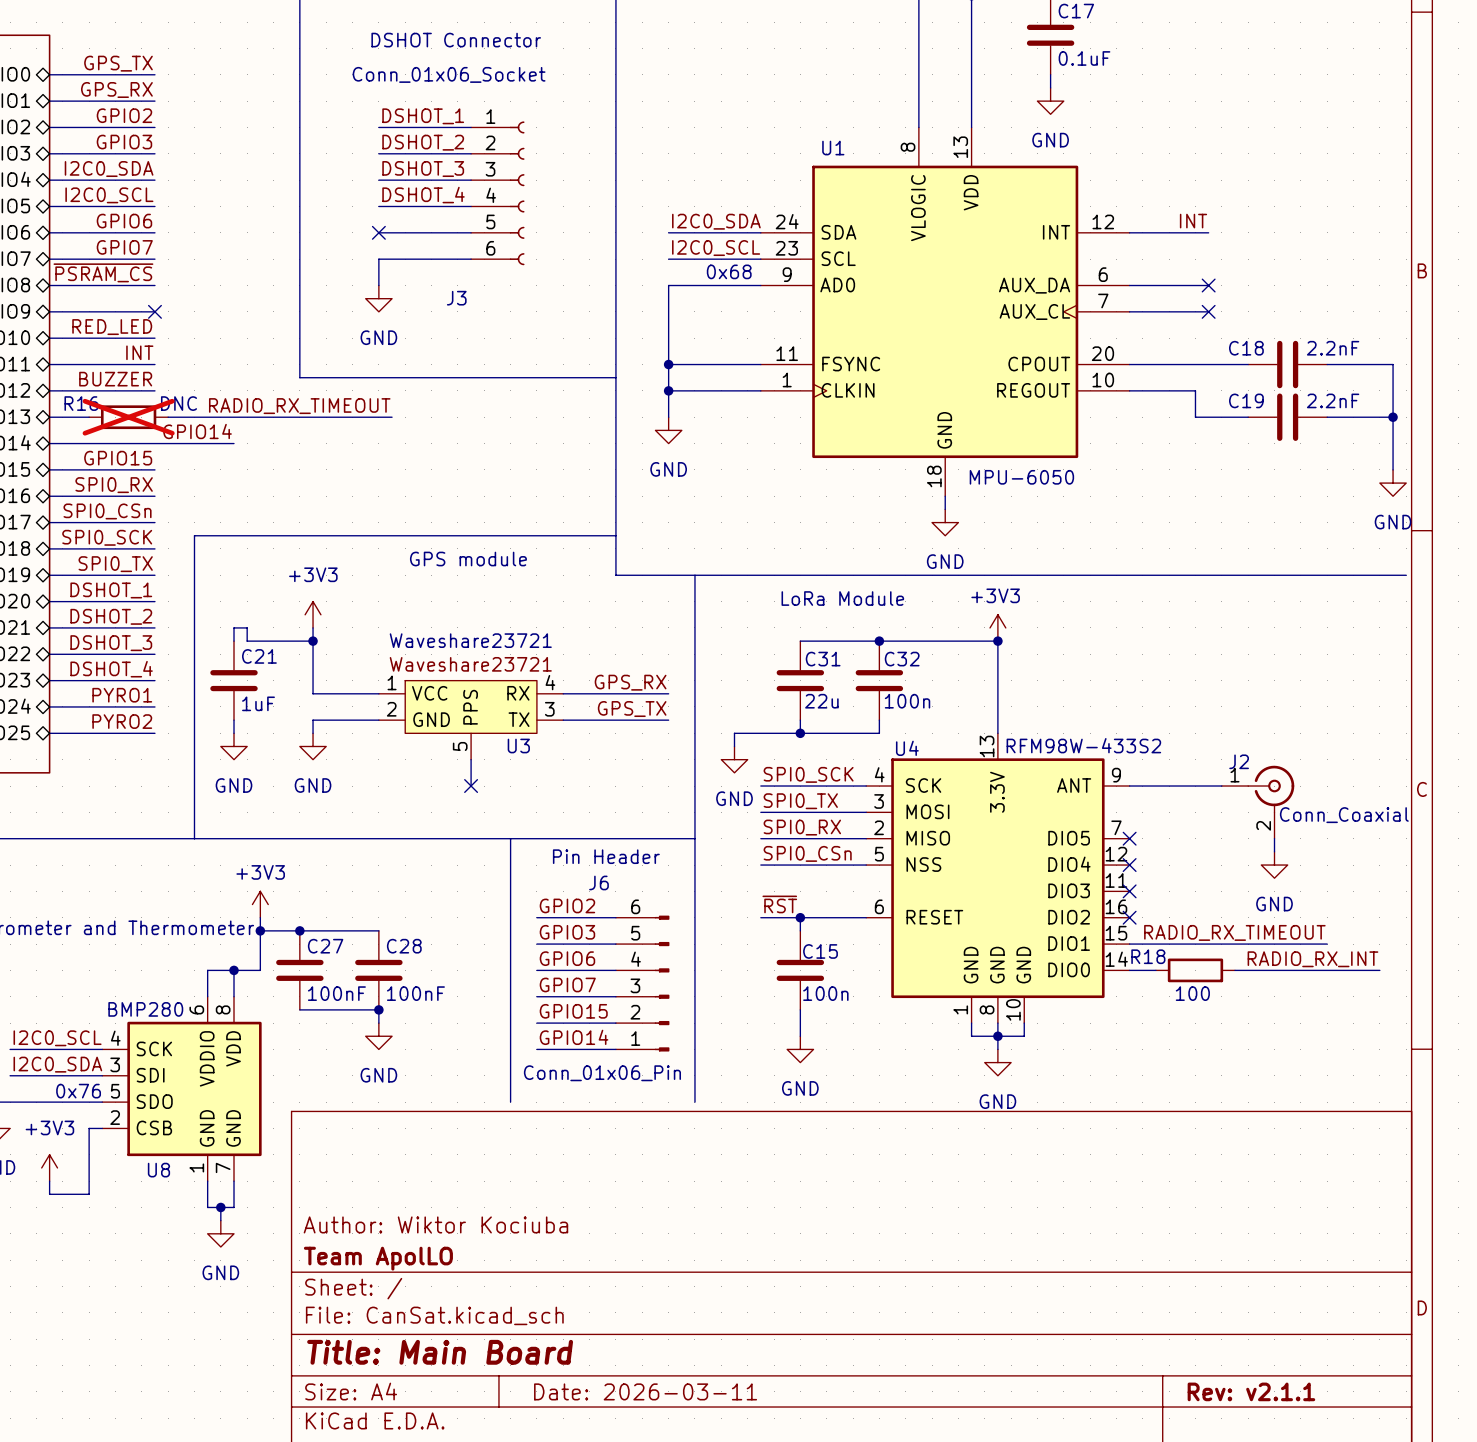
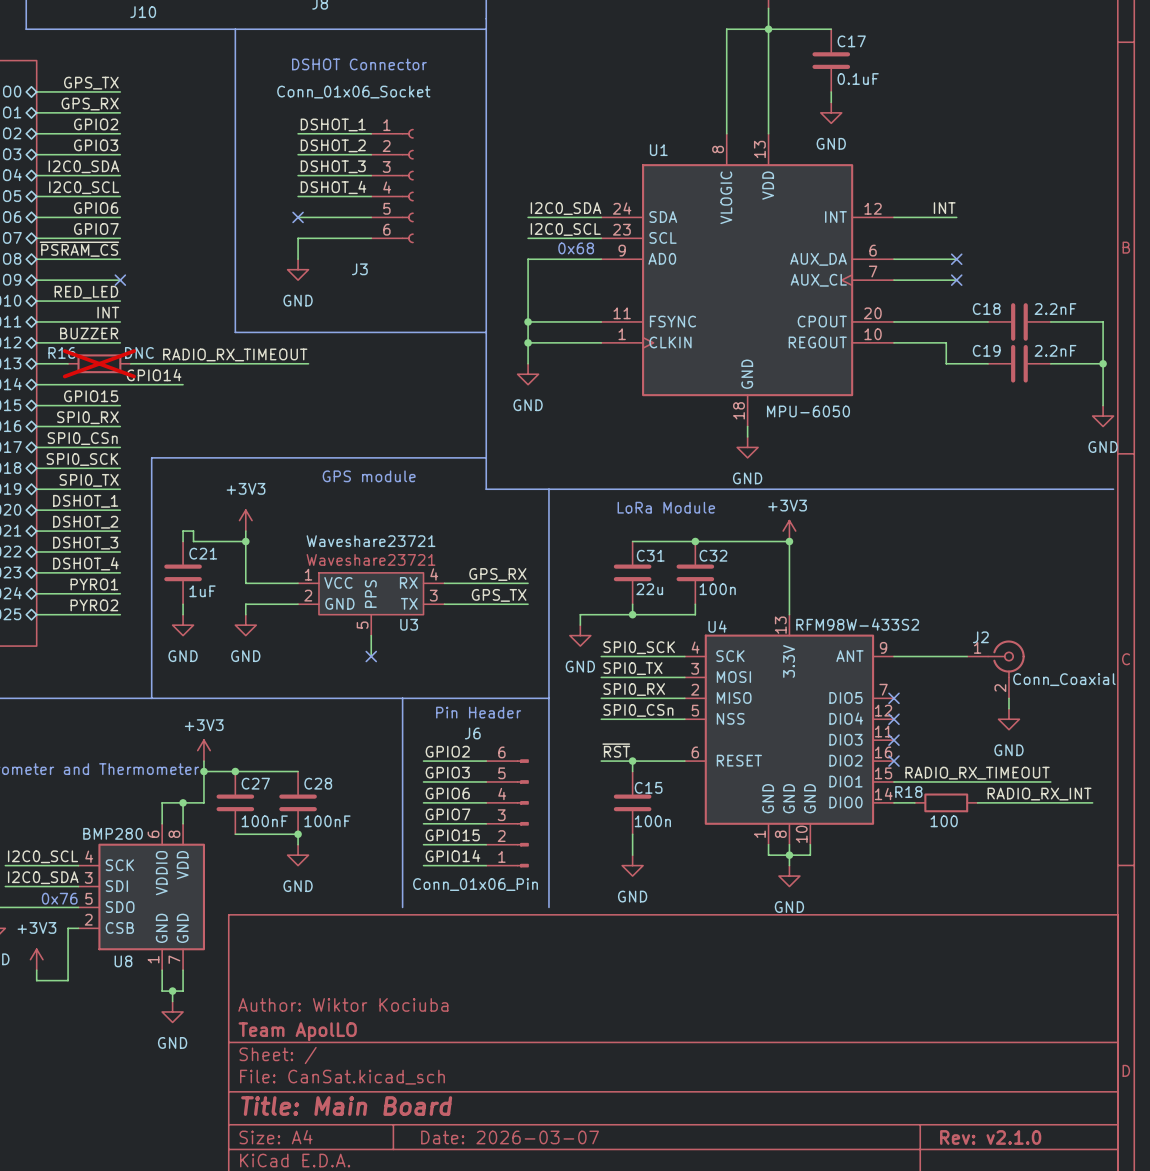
title block: Date: 2026-03-11 (645, 1391) -> Date: 2026-03-07 (510, 1137)
title block: Rev: v2.1.1 (1251, 1391) -> Rev: v2.1.0 (990, 1137)

